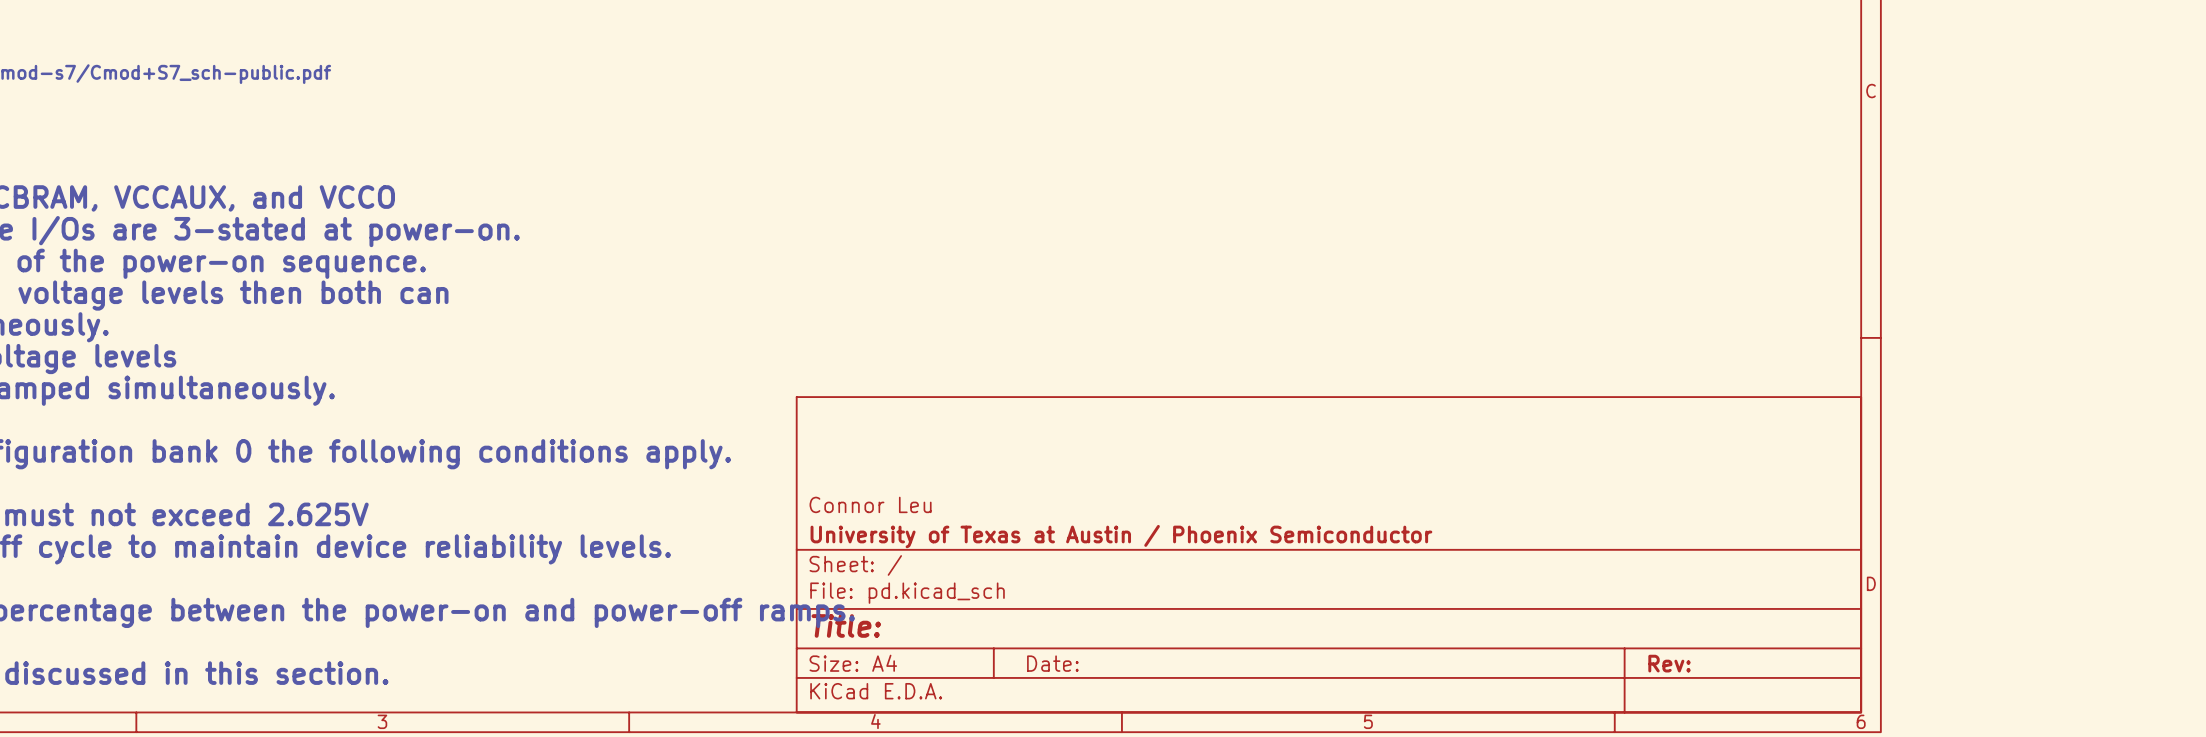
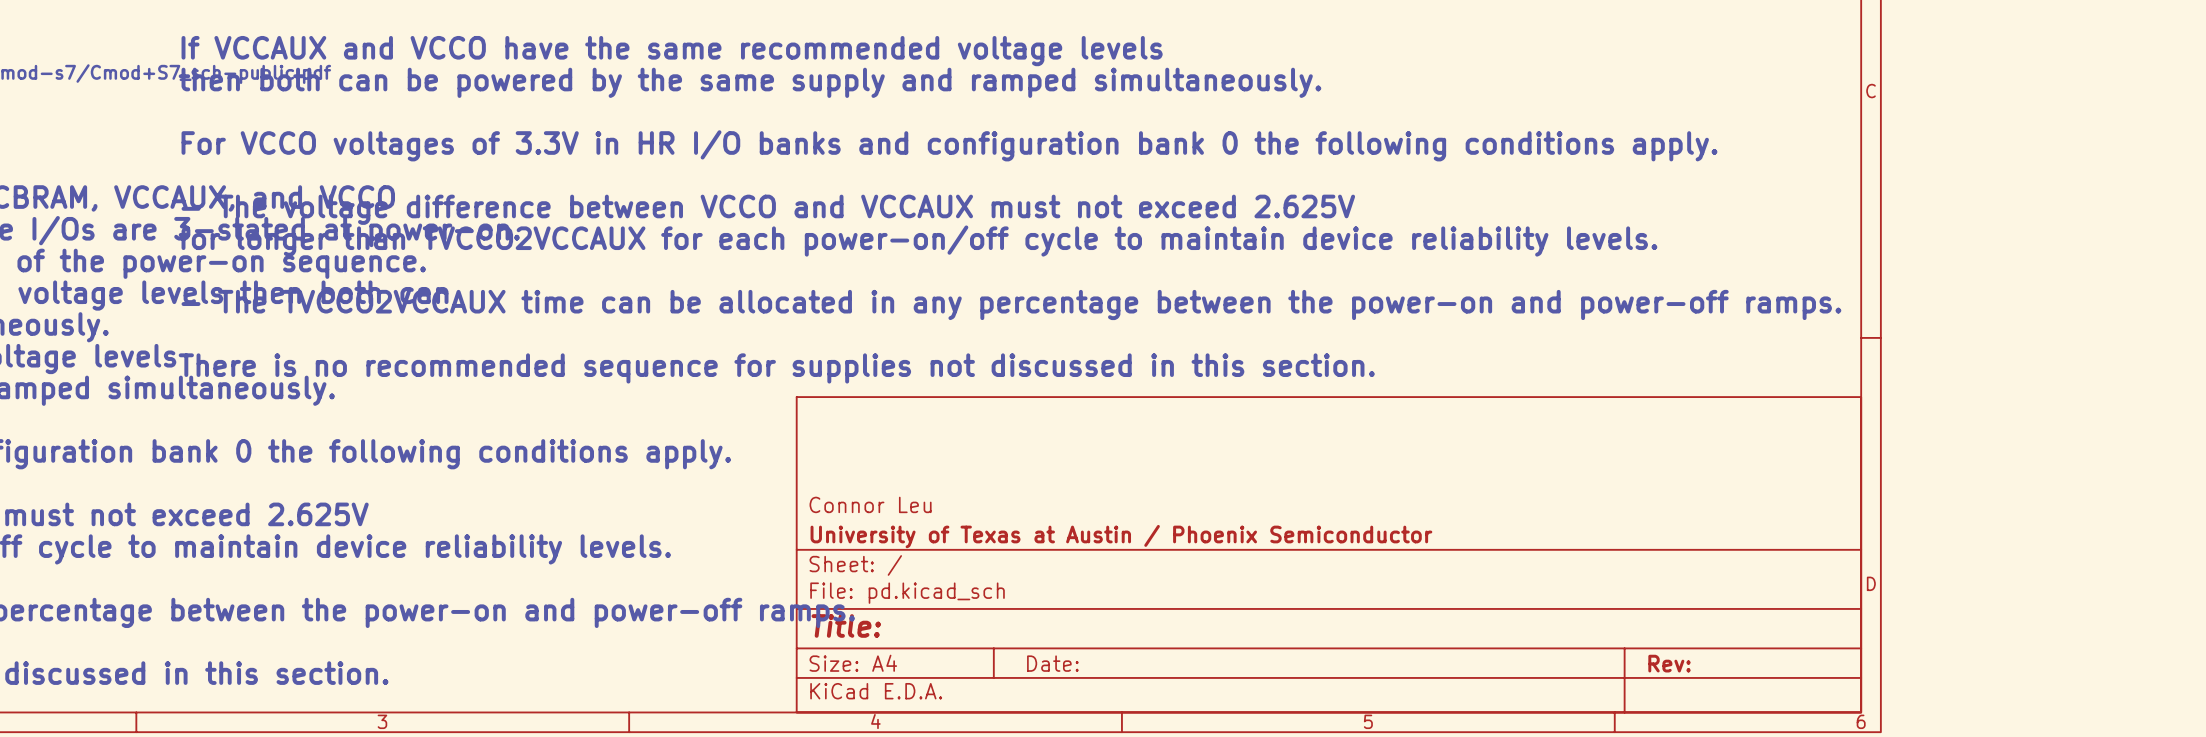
text: none -> If VCCAUX and VCCO have the same recommended voltage levels (672, 51)
text: none -> then both can be powered by the same supply and ramped simultaneously. (750, 82)
text: none -> For VCCO voltages of 3.3V in HR I/O banks and configuration bank 0 the following conditions apply. (949, 145)
text: none -> - The voltage difference between VCCO and VCCAUX must not exceed 2.625V (768, 209)
text: none -> for longer than TVCCO2VCCAUX for each power-on/off cycle to maintain device reliability levels. (918, 241)
text: none -> - The TVCCO2VCCAUX time can be allocated in any percentage between the power-on and power-off ramps. (1011, 304)
text: none -> There is no recommended sequence for supplies not discussed in this section. (776, 368)

